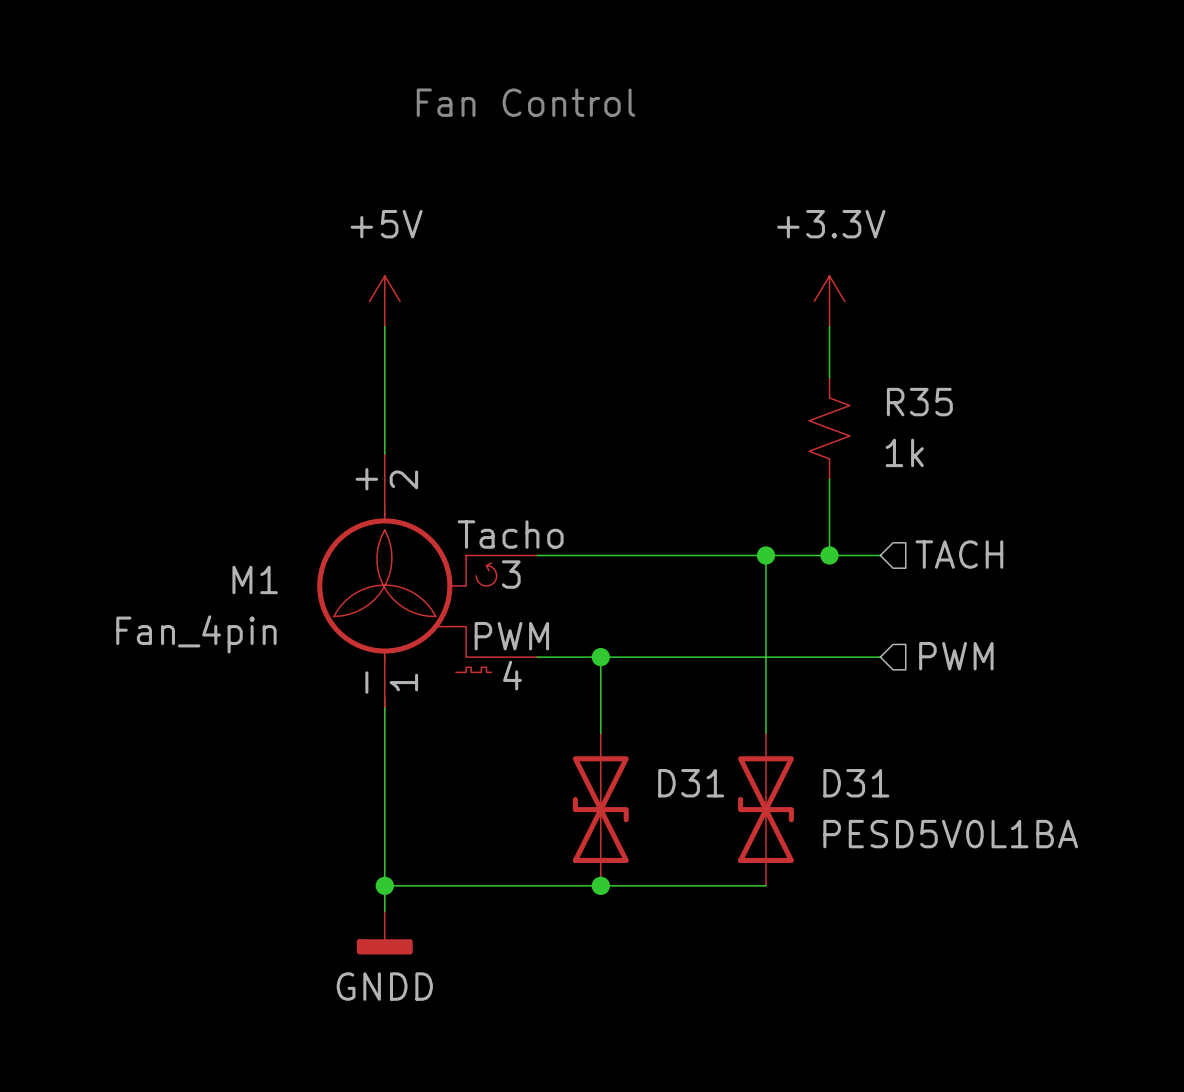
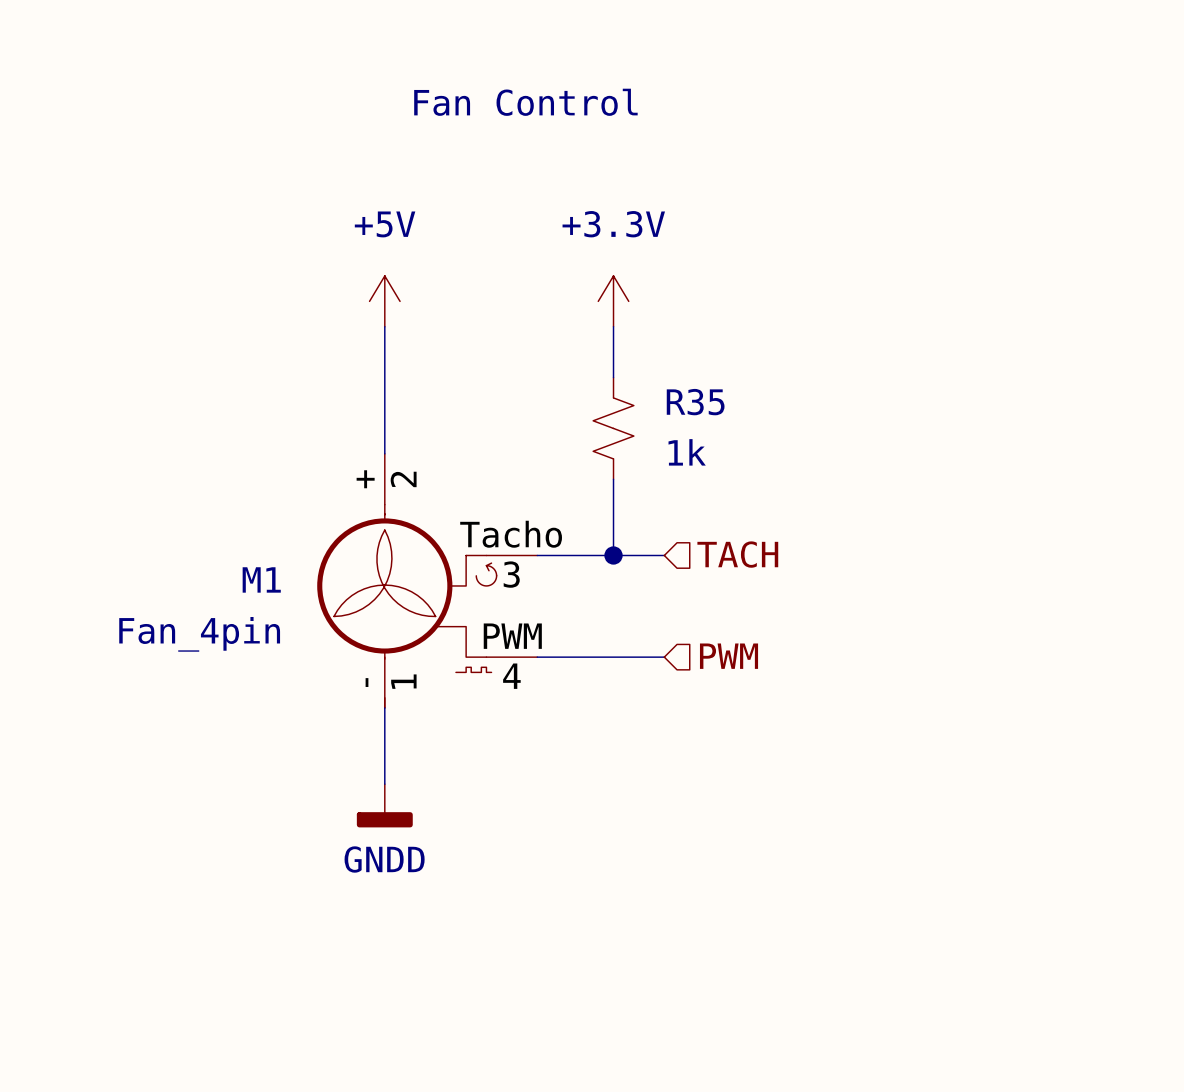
power symbol position: +3.3V (829, 301) -> +3.3V (613, 301)
wire: (829, 326) (829, 377) -> (613, 326) (613, 377)
R35 position: (829, 428) -> (613, 428)
wire: (829, 479) (829, 555) -> (613, 479) (613, 555)
hierarchical label position: TACH (959, 554) -> TACH (737, 554)
junction: none -> (613, 555)
wire: (664, 555) (880, 555) -> none
wire: (765, 555) (765, 733) -> none
junction: (765, 555) -> none
junction: (829, 555) -> none
hierarchical label position: PWM (956, 656) -> PWM (729, 656)
wire: (600, 657) (600, 733) -> none
junction: (600, 657) -> none
wire: (664, 657) (880, 657) -> none
wire: (384, 784) (384, 911) -> none
D31: (600, 809) -> none
D31: PESD5V0L1BA (765, 809) -> none
wire: (384, 885) (765, 885) -> none
junction: (384, 885) -> none
junction: (600, 885) -> none
power symbol position: GNDD (384, 932) -> GNDD (384, 805)

